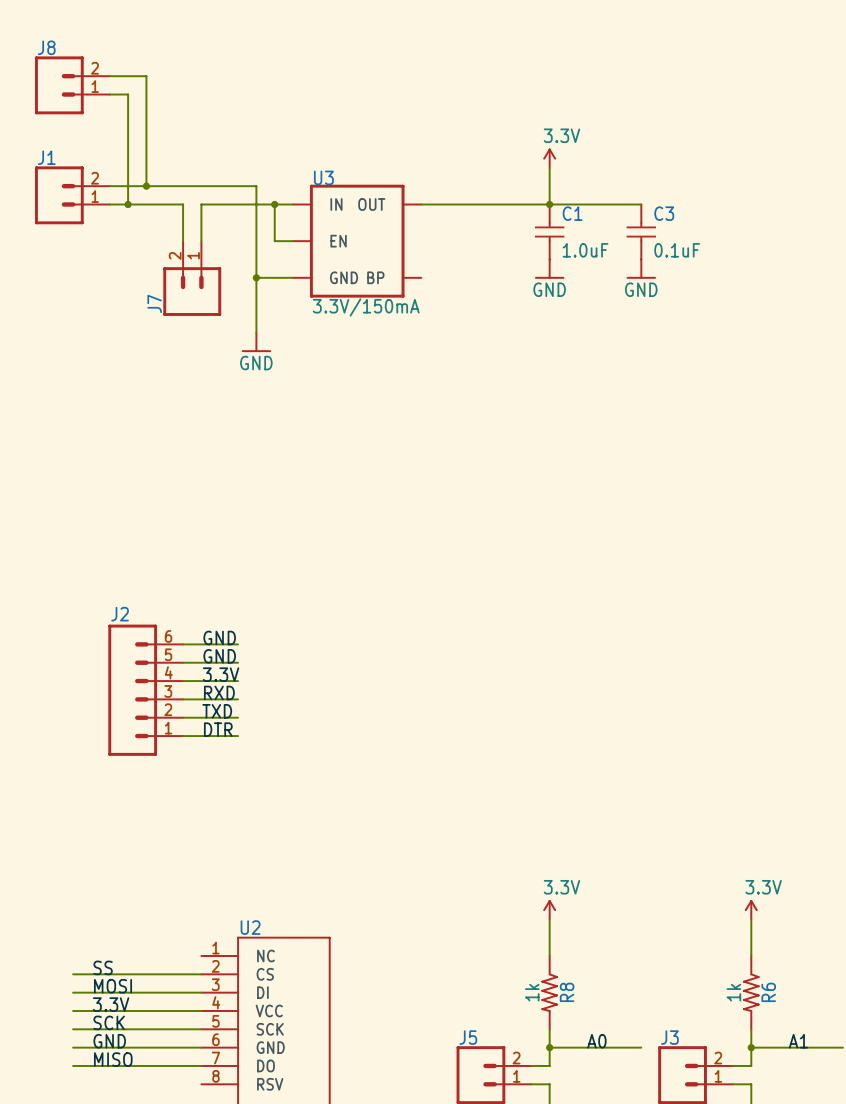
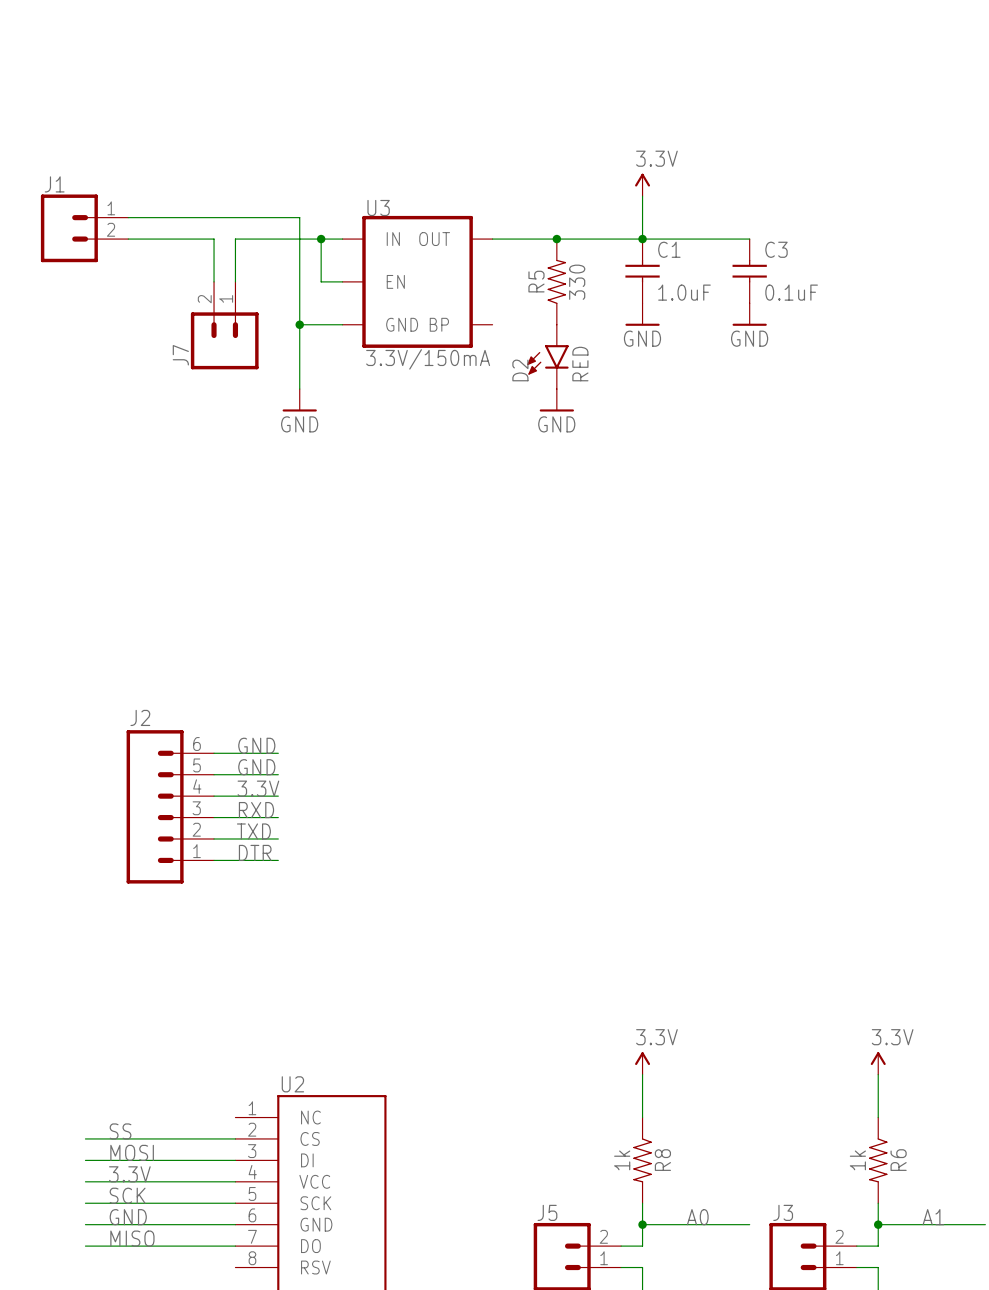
wire: (109, 76) (146, 76) (146, 186) -> none
J8: (72, 85) -> none
wire: (109, 94) (128, 94) (128, 204) -> none
junction: (146, 186) -> none
J1 flip: as is (59, 195) -> up-down (69, 228)
junction: (128, 204) -> none
junction: none -> (556, 239)
R5: none -> 330 (556, 281)
D2: none -> RED (547, 356)
power symbol: none -> GND (556, 400)

